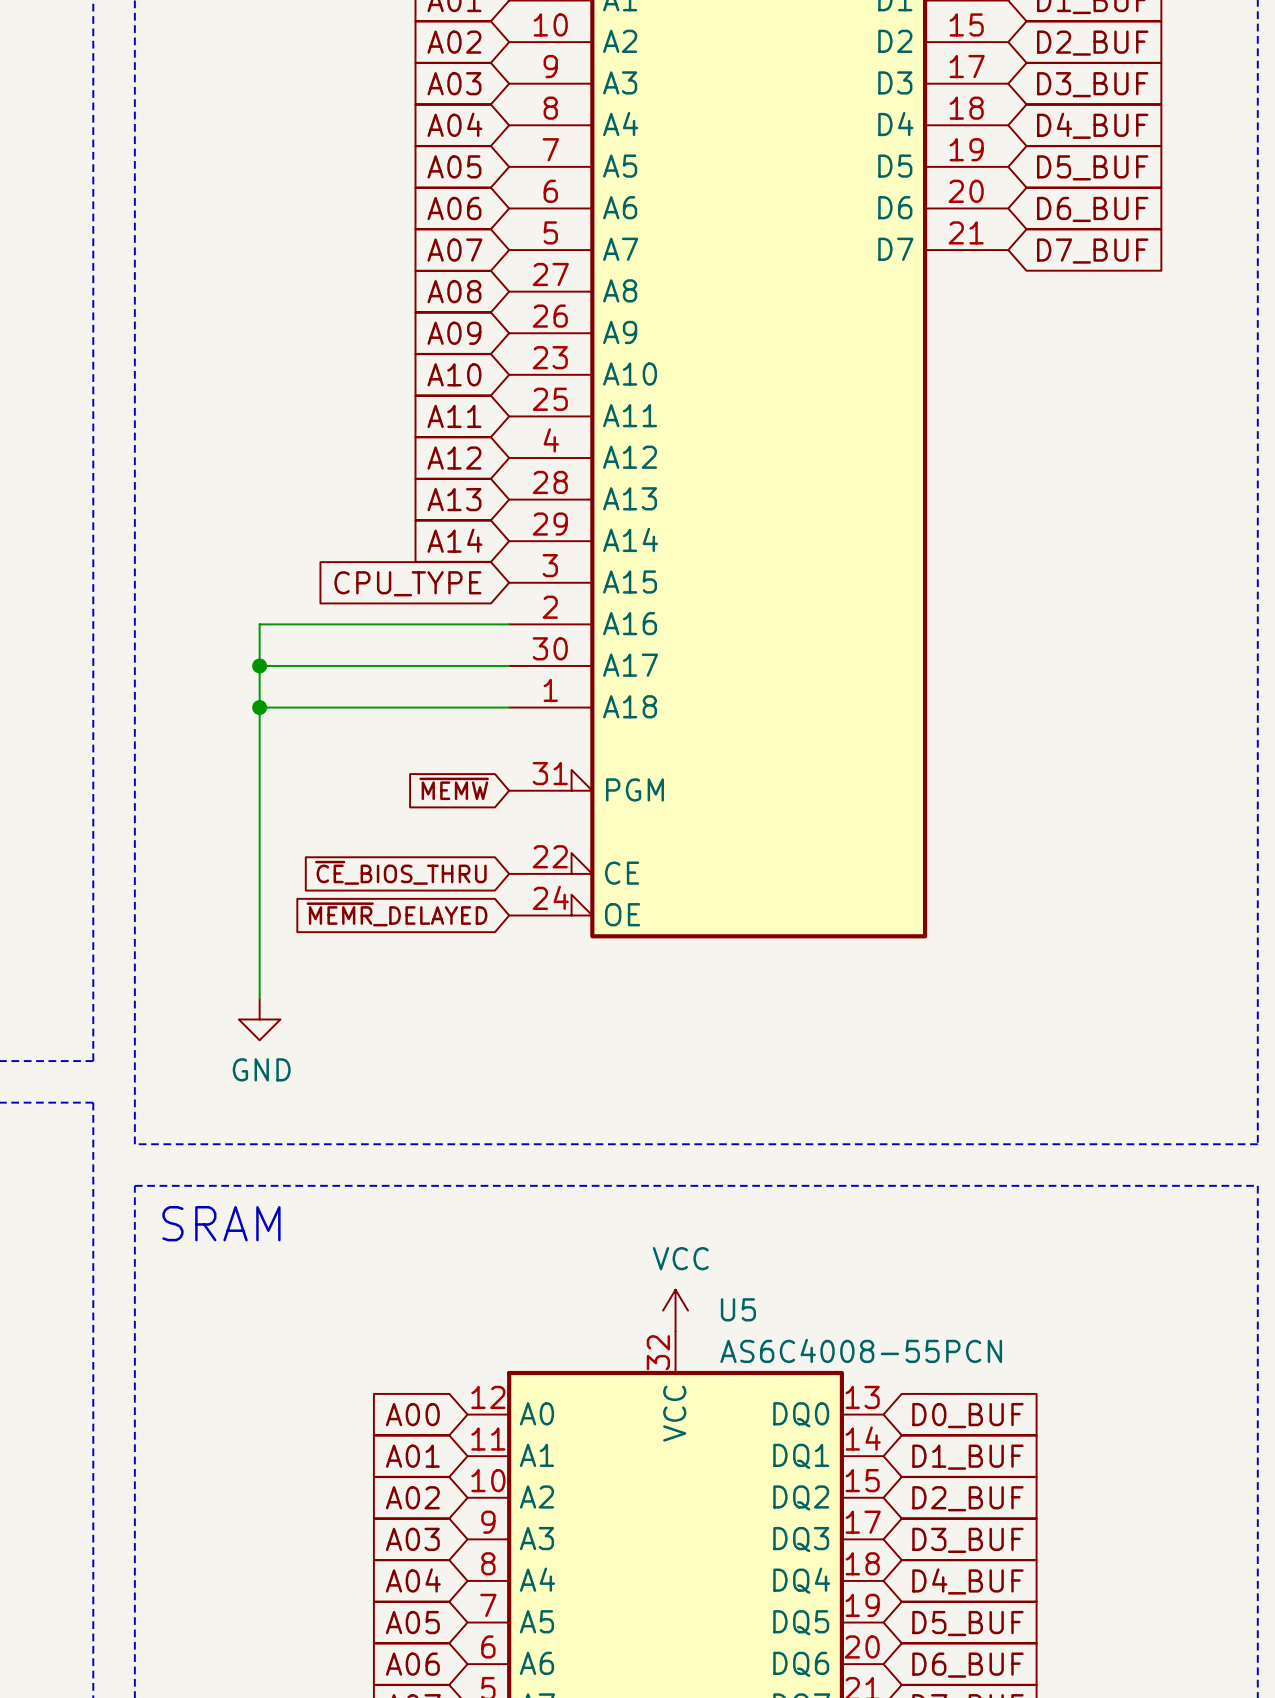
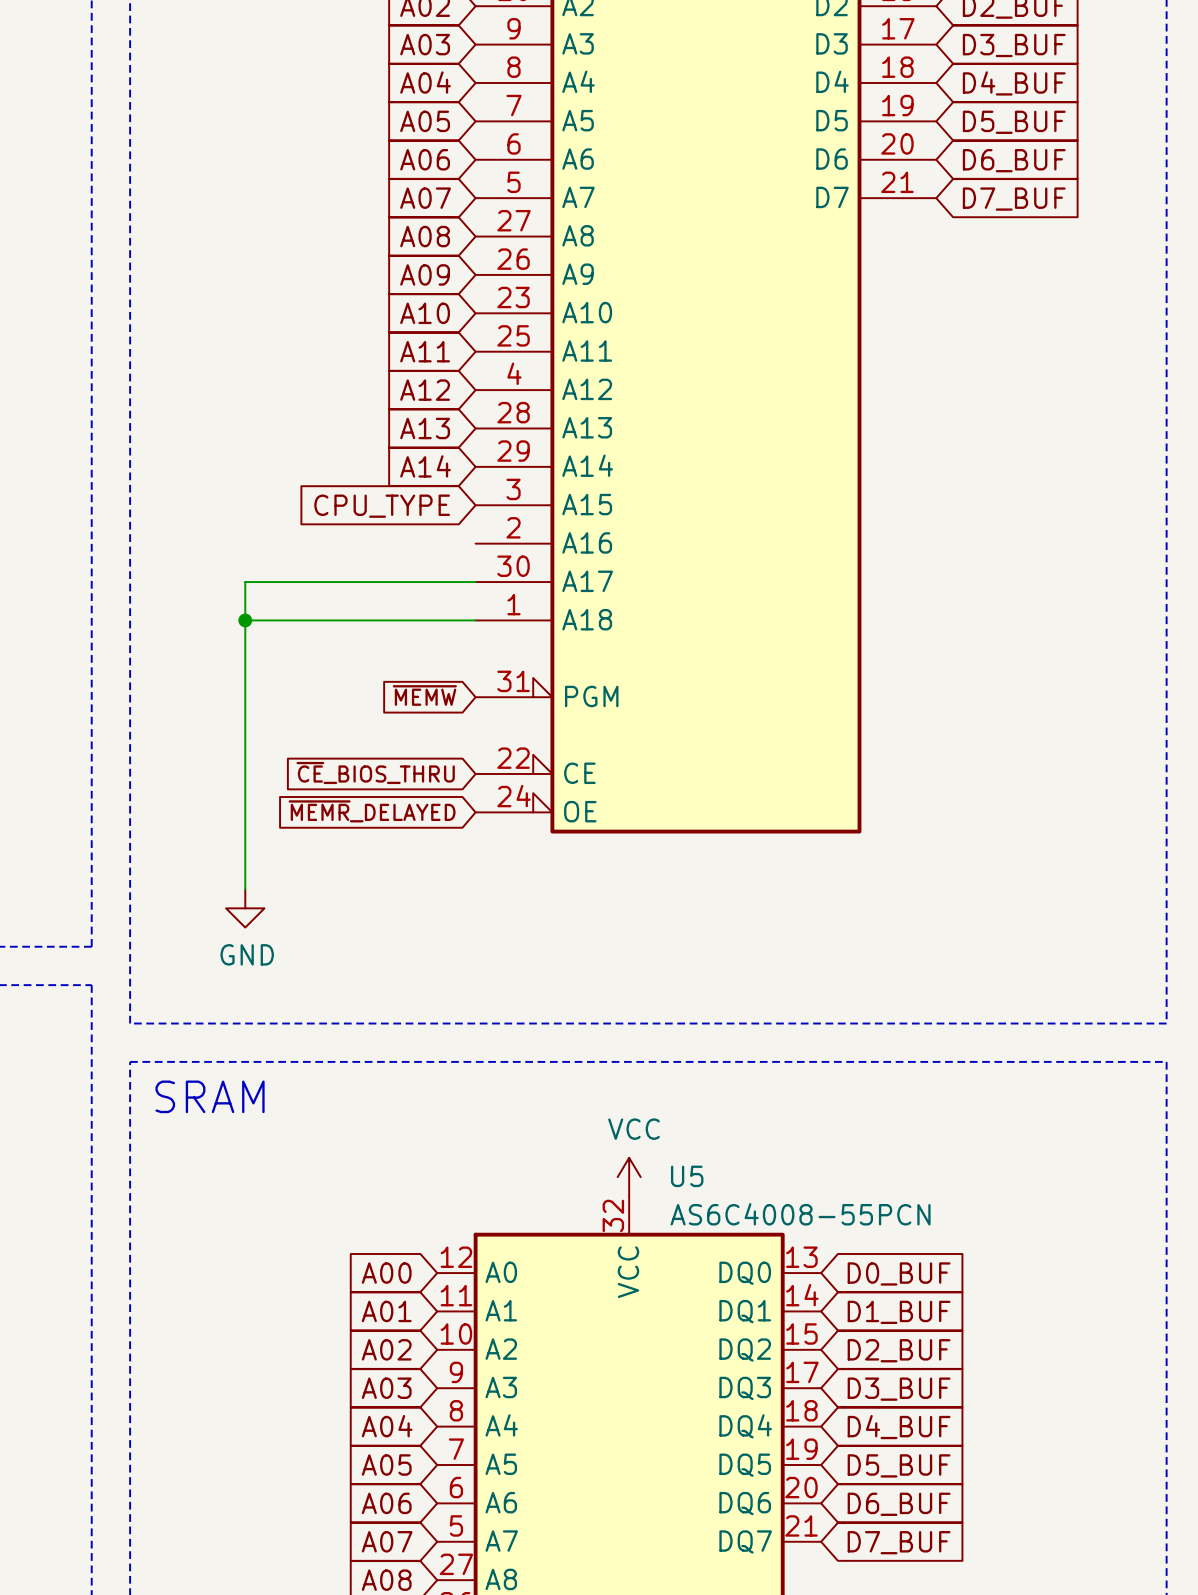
wire: (509, 624) (259, 624) (259, 665) -> none
junction: (259, 665) -> none

